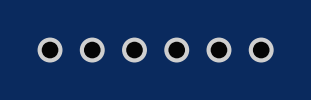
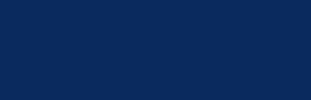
part: (155, 50) -> none

